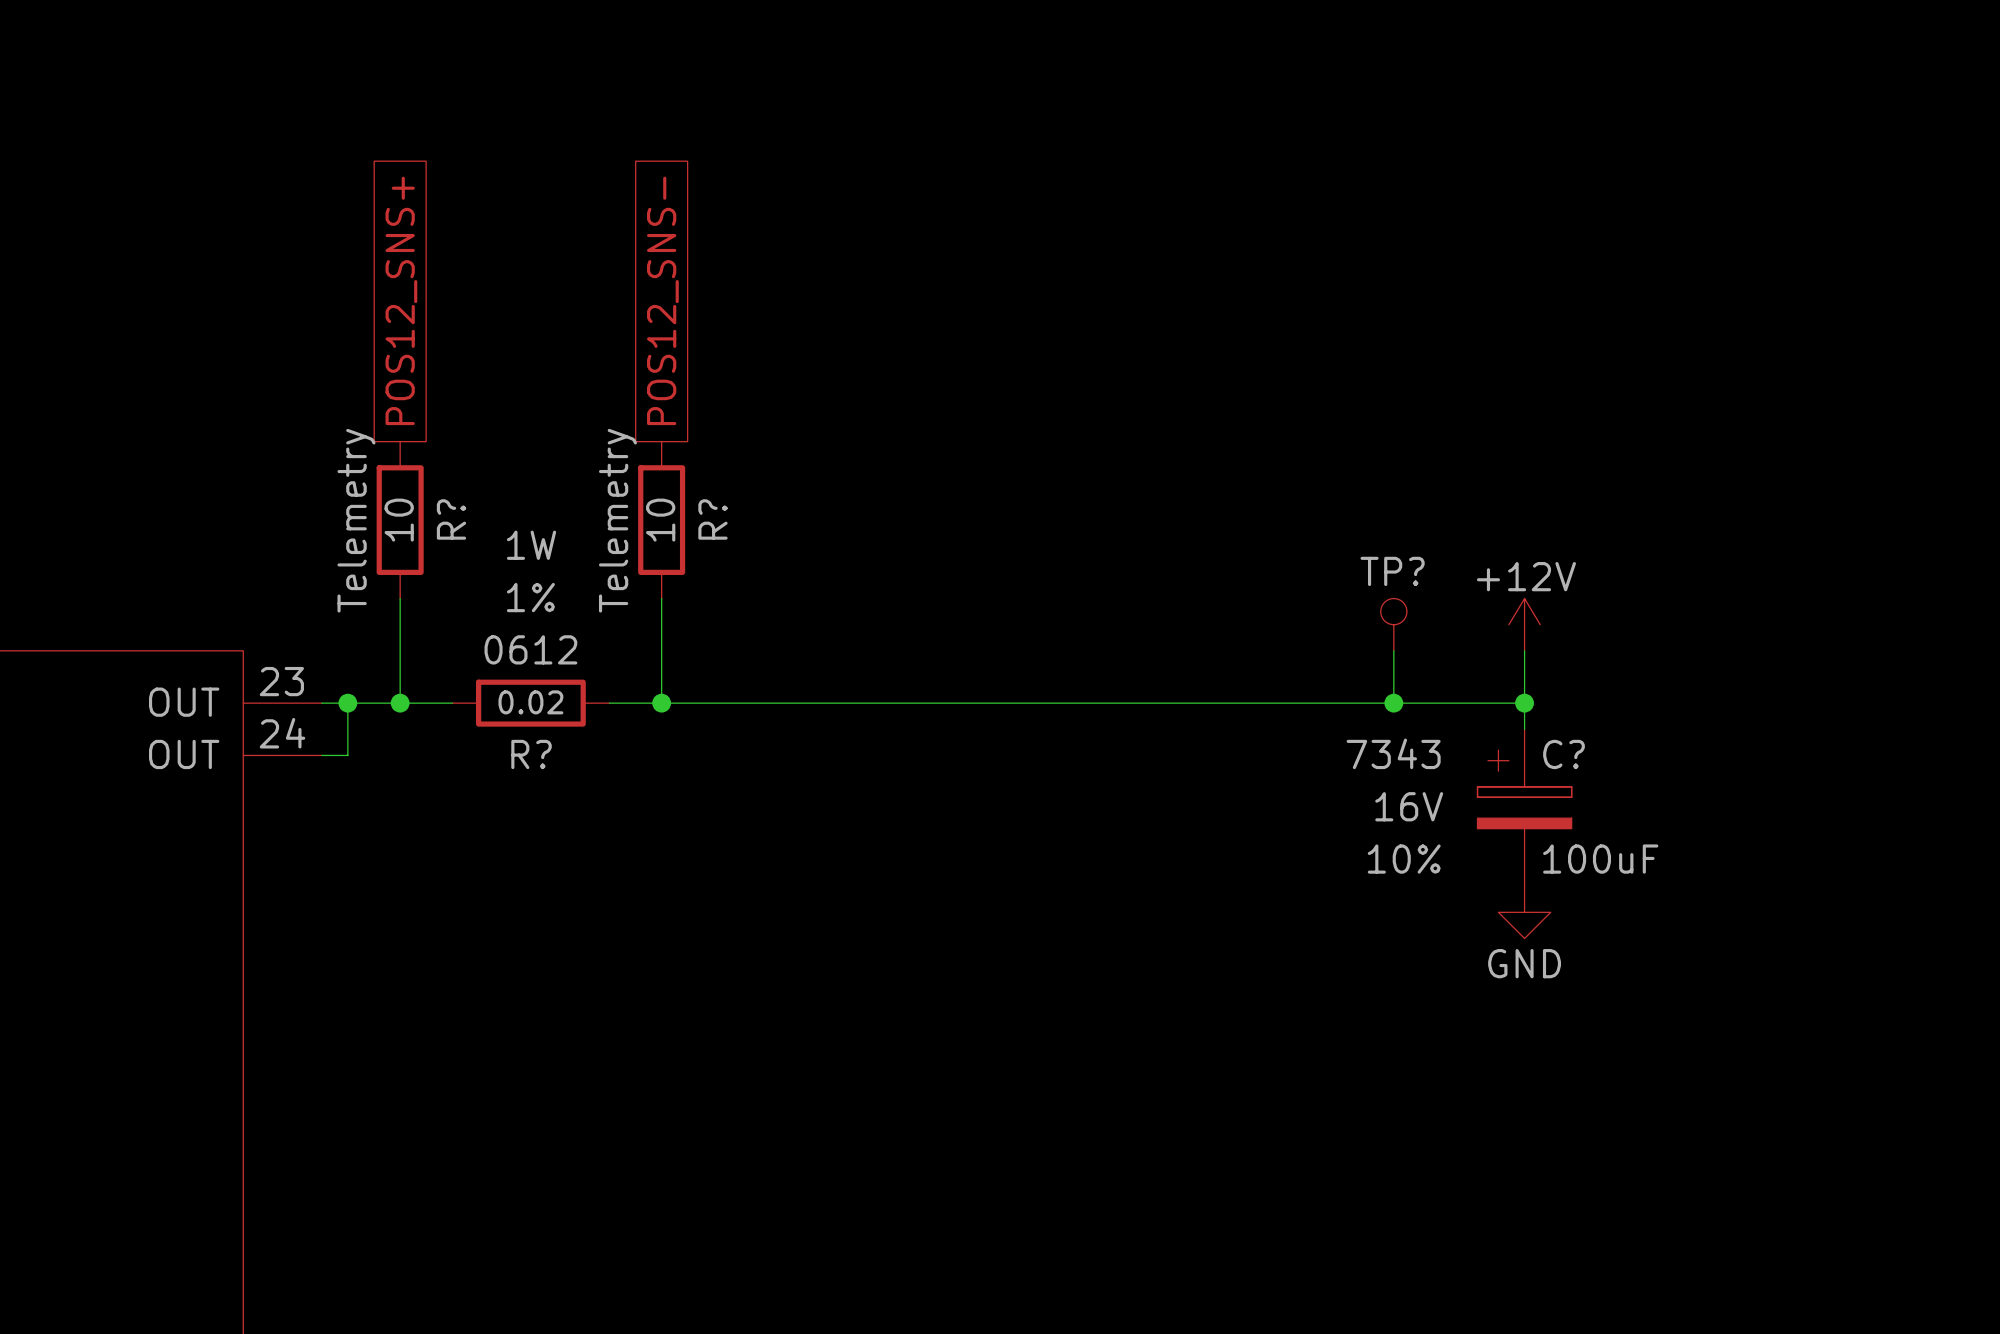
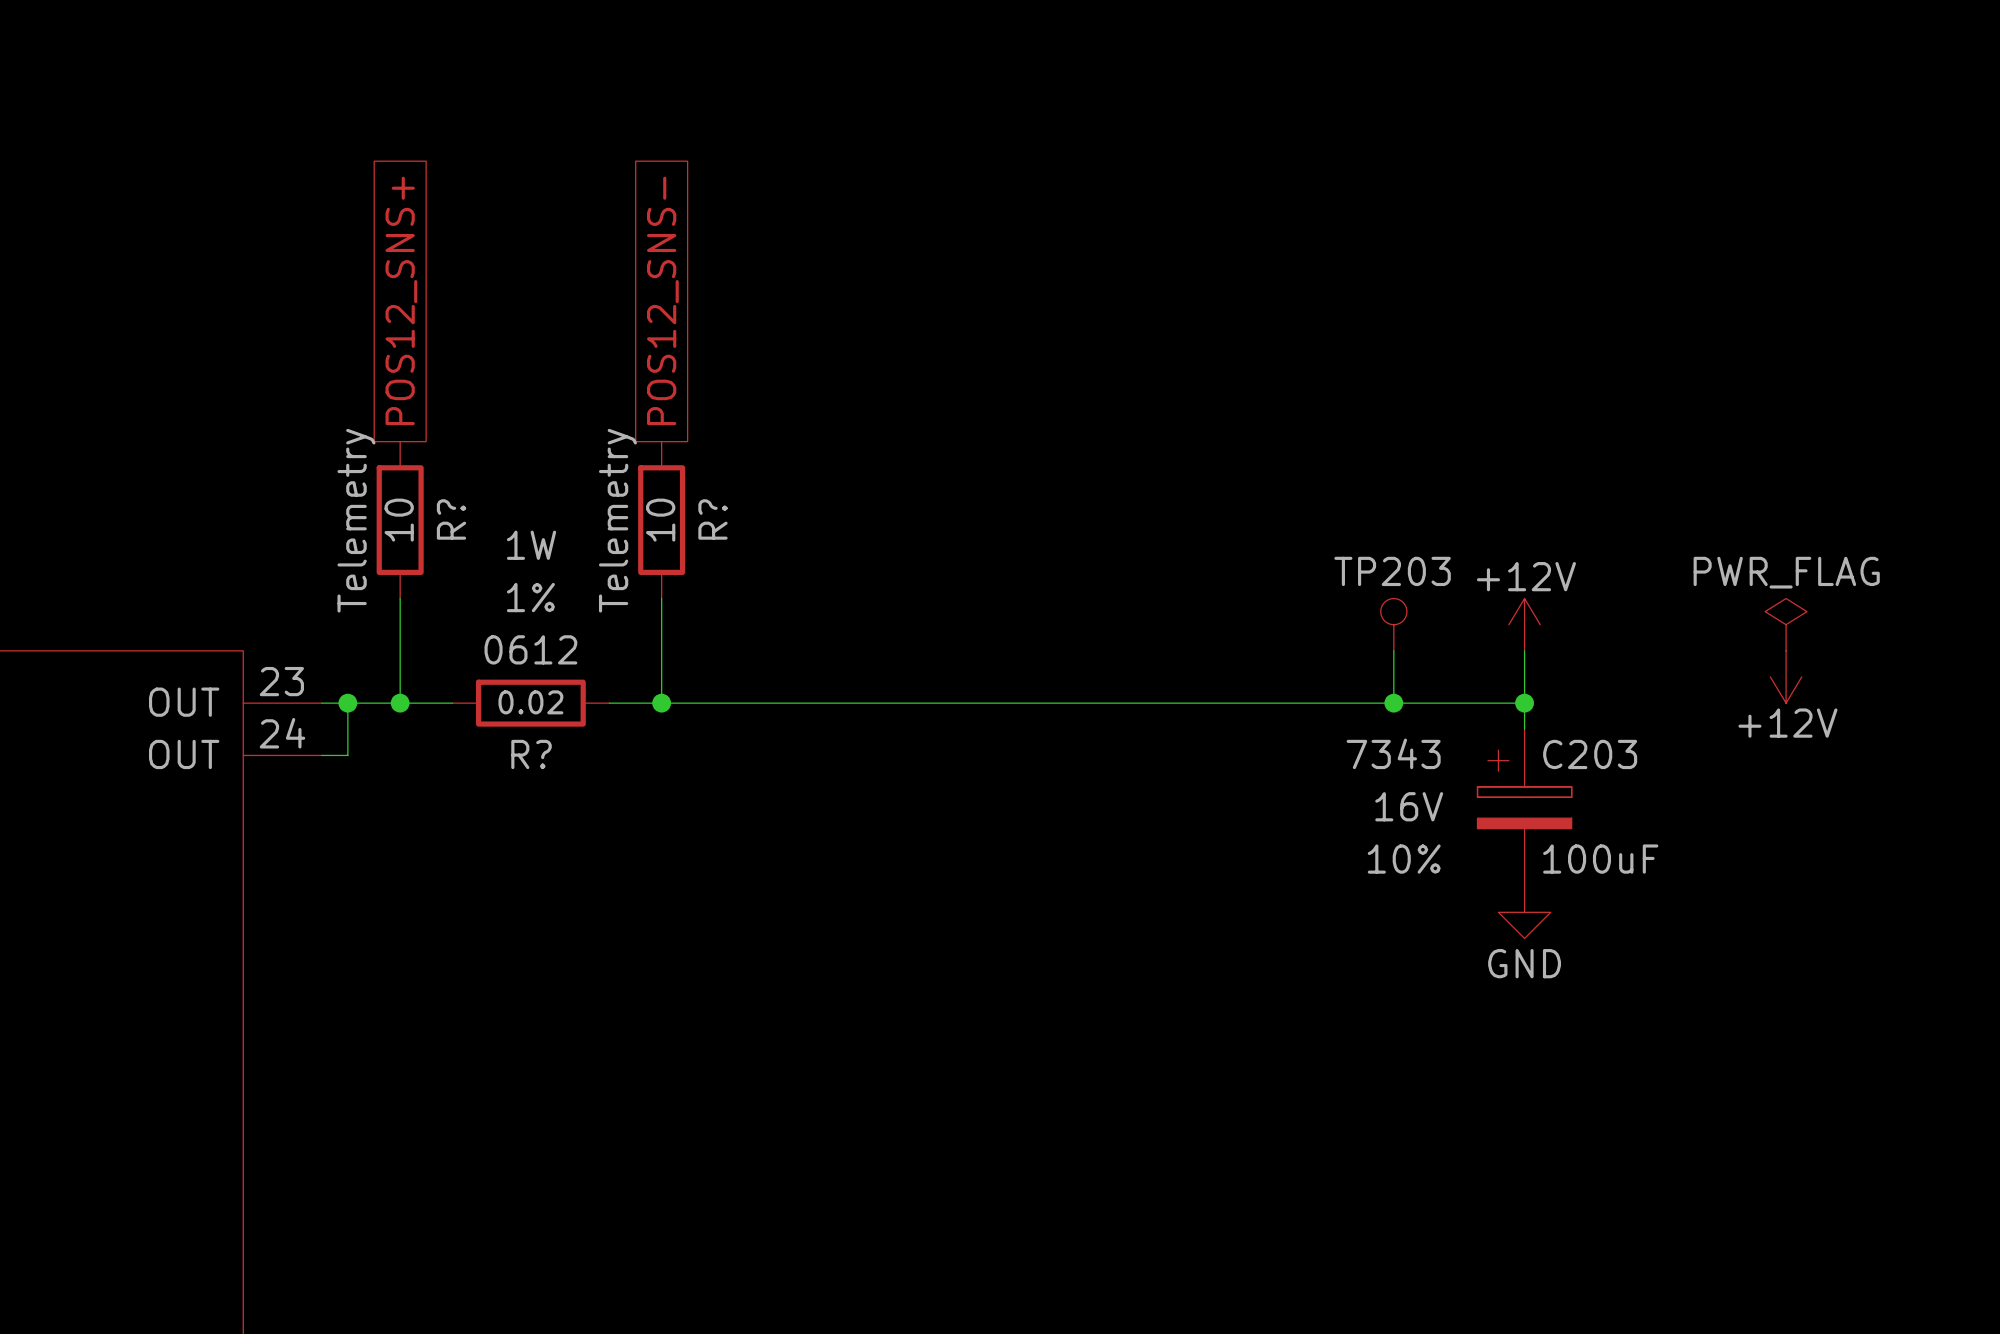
TP? name: TP? (1392, 571) -> TP203 (1392, 571)
power symbol: none -> PWR_FLAG (1786, 624)
power symbol: none -> +12V (1786, 676)
C? name: C? (1564, 754) -> C203 (1590, 754)

